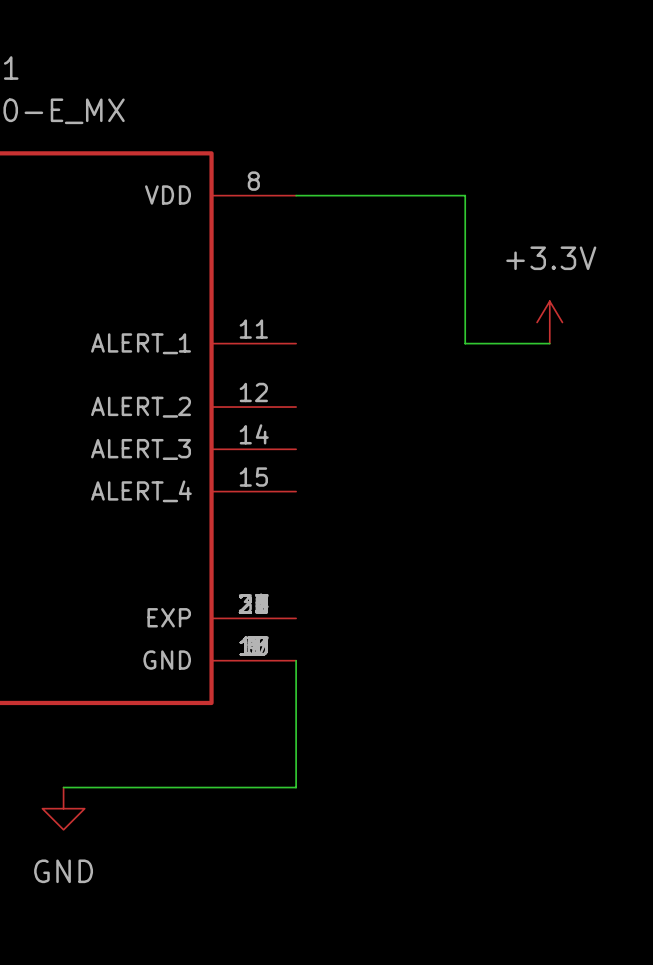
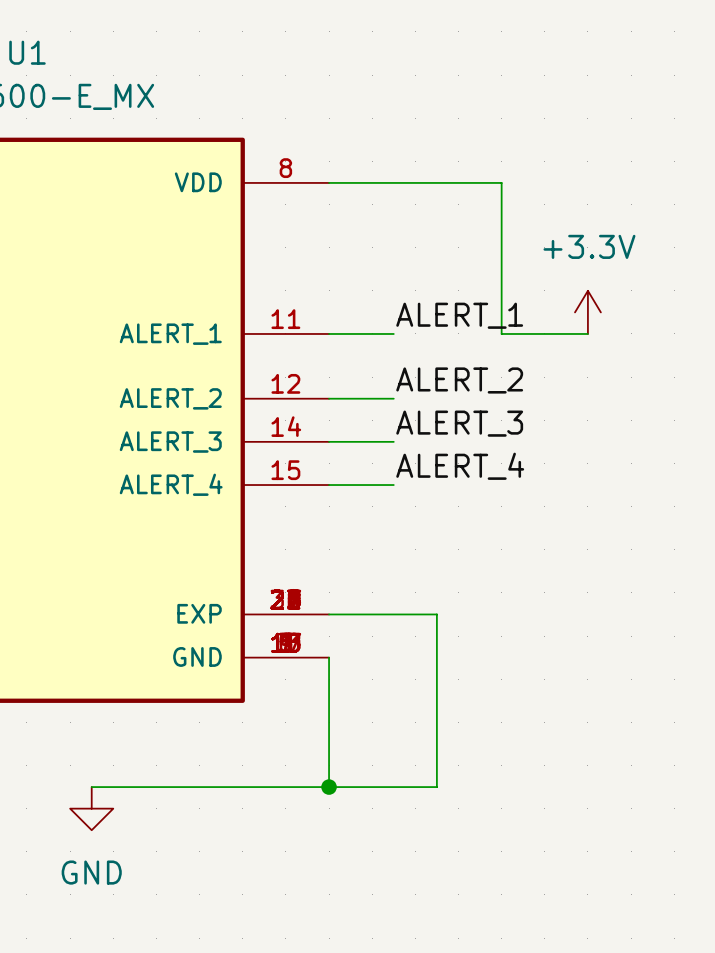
label: none -> ALERT_1 (459, 315)
wire: none -> (329, 333) (393, 333)
label: none -> ALERT_2 (459, 380)
wire: none -> (329, 398) (393, 398)
label: none -> ALERT_3 (459, 423)
wire: none -> (329, 441) (393, 441)
label: none -> ALERT_4 (460, 466)
wire: none -> (329, 485) (393, 485)
wire: none -> (329, 614) (436, 614) (436, 787) (329, 787)
junction: none -> (329, 787)

